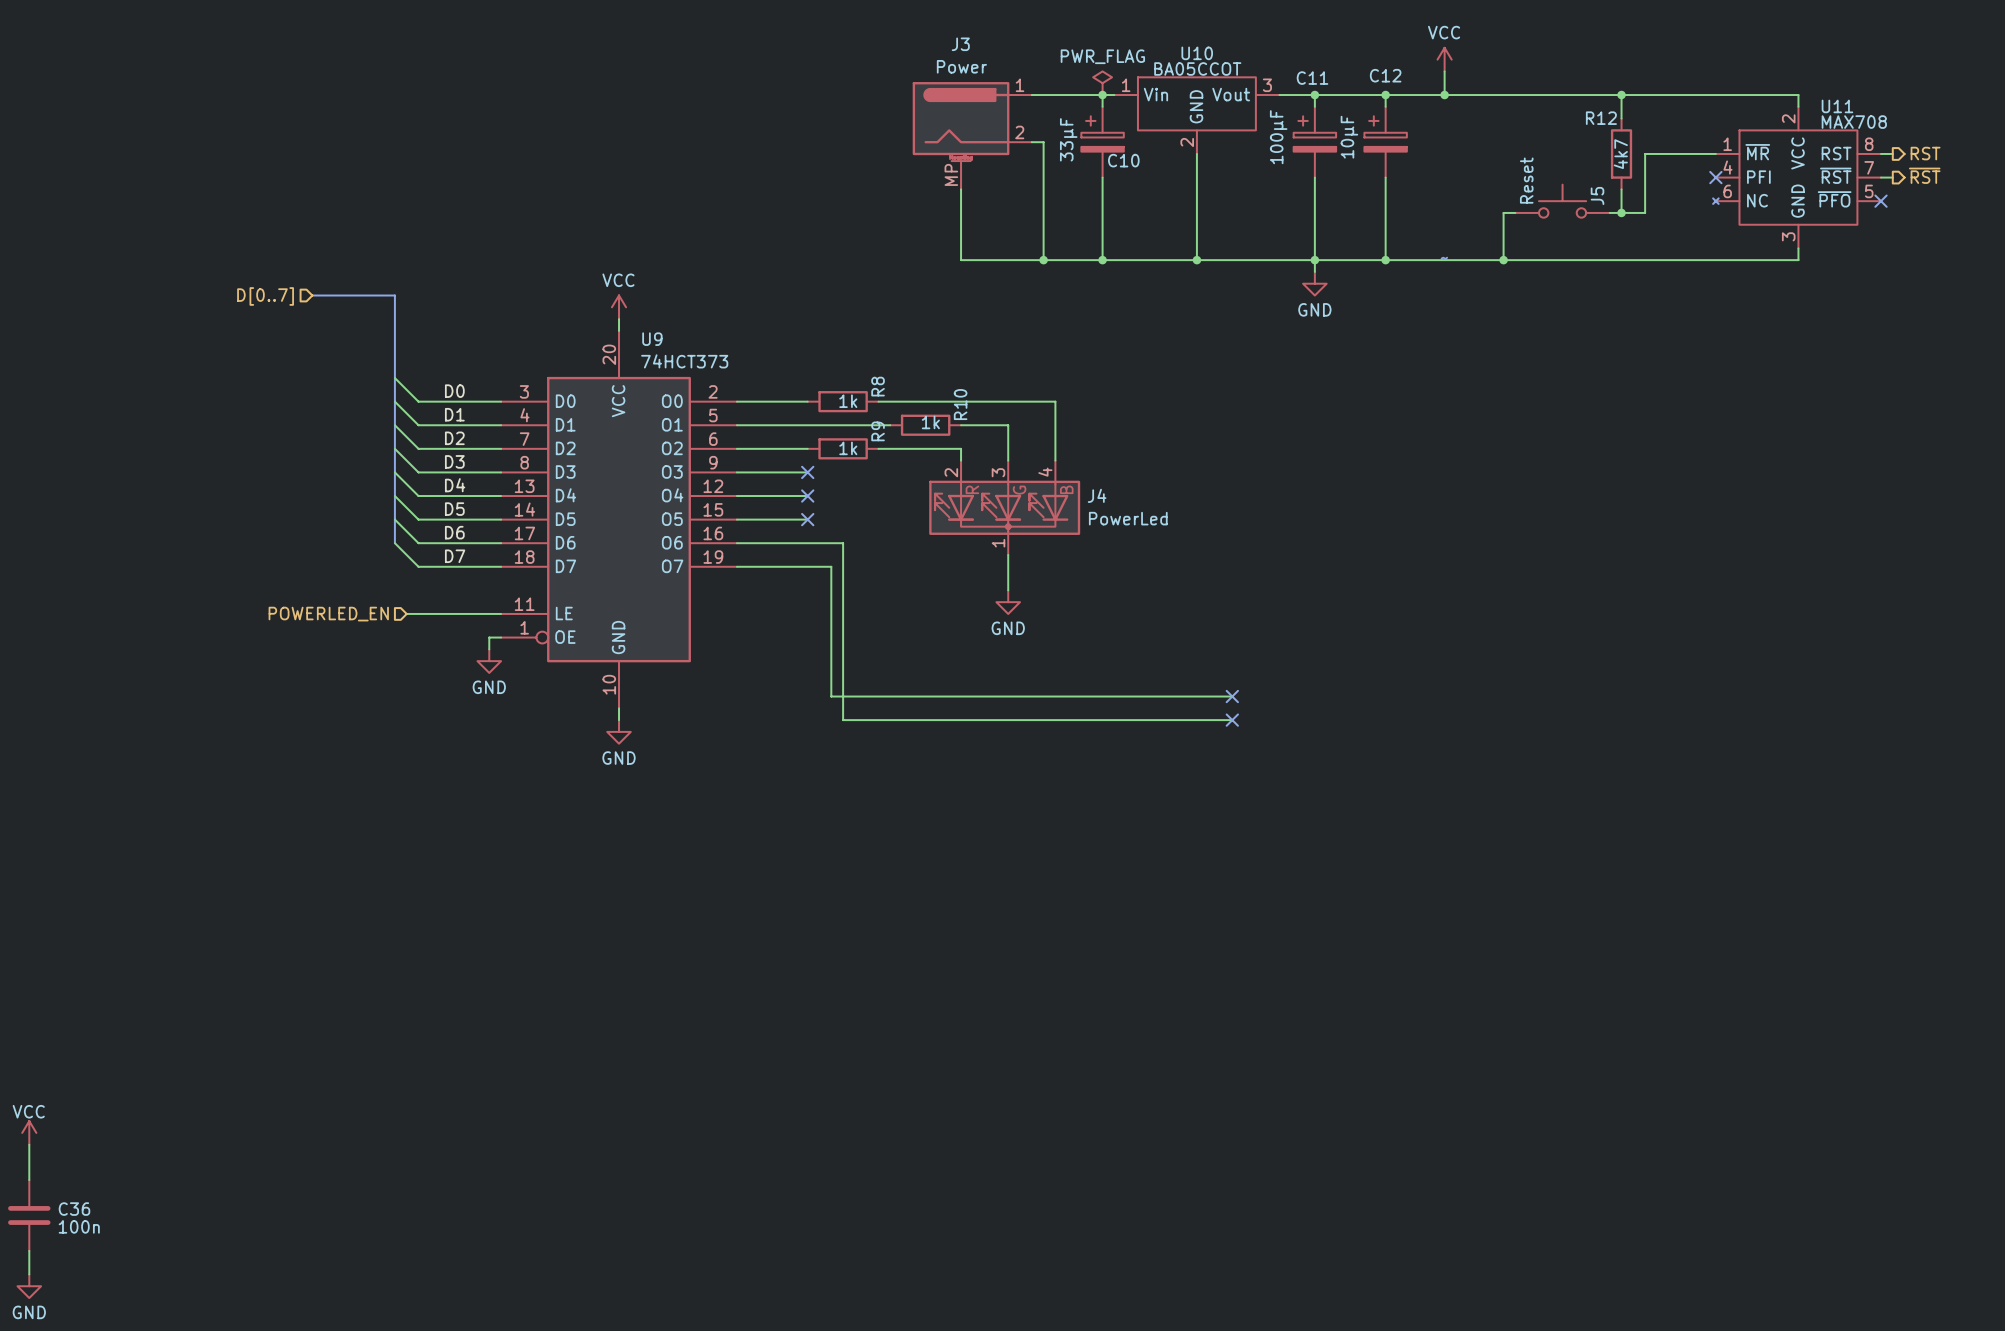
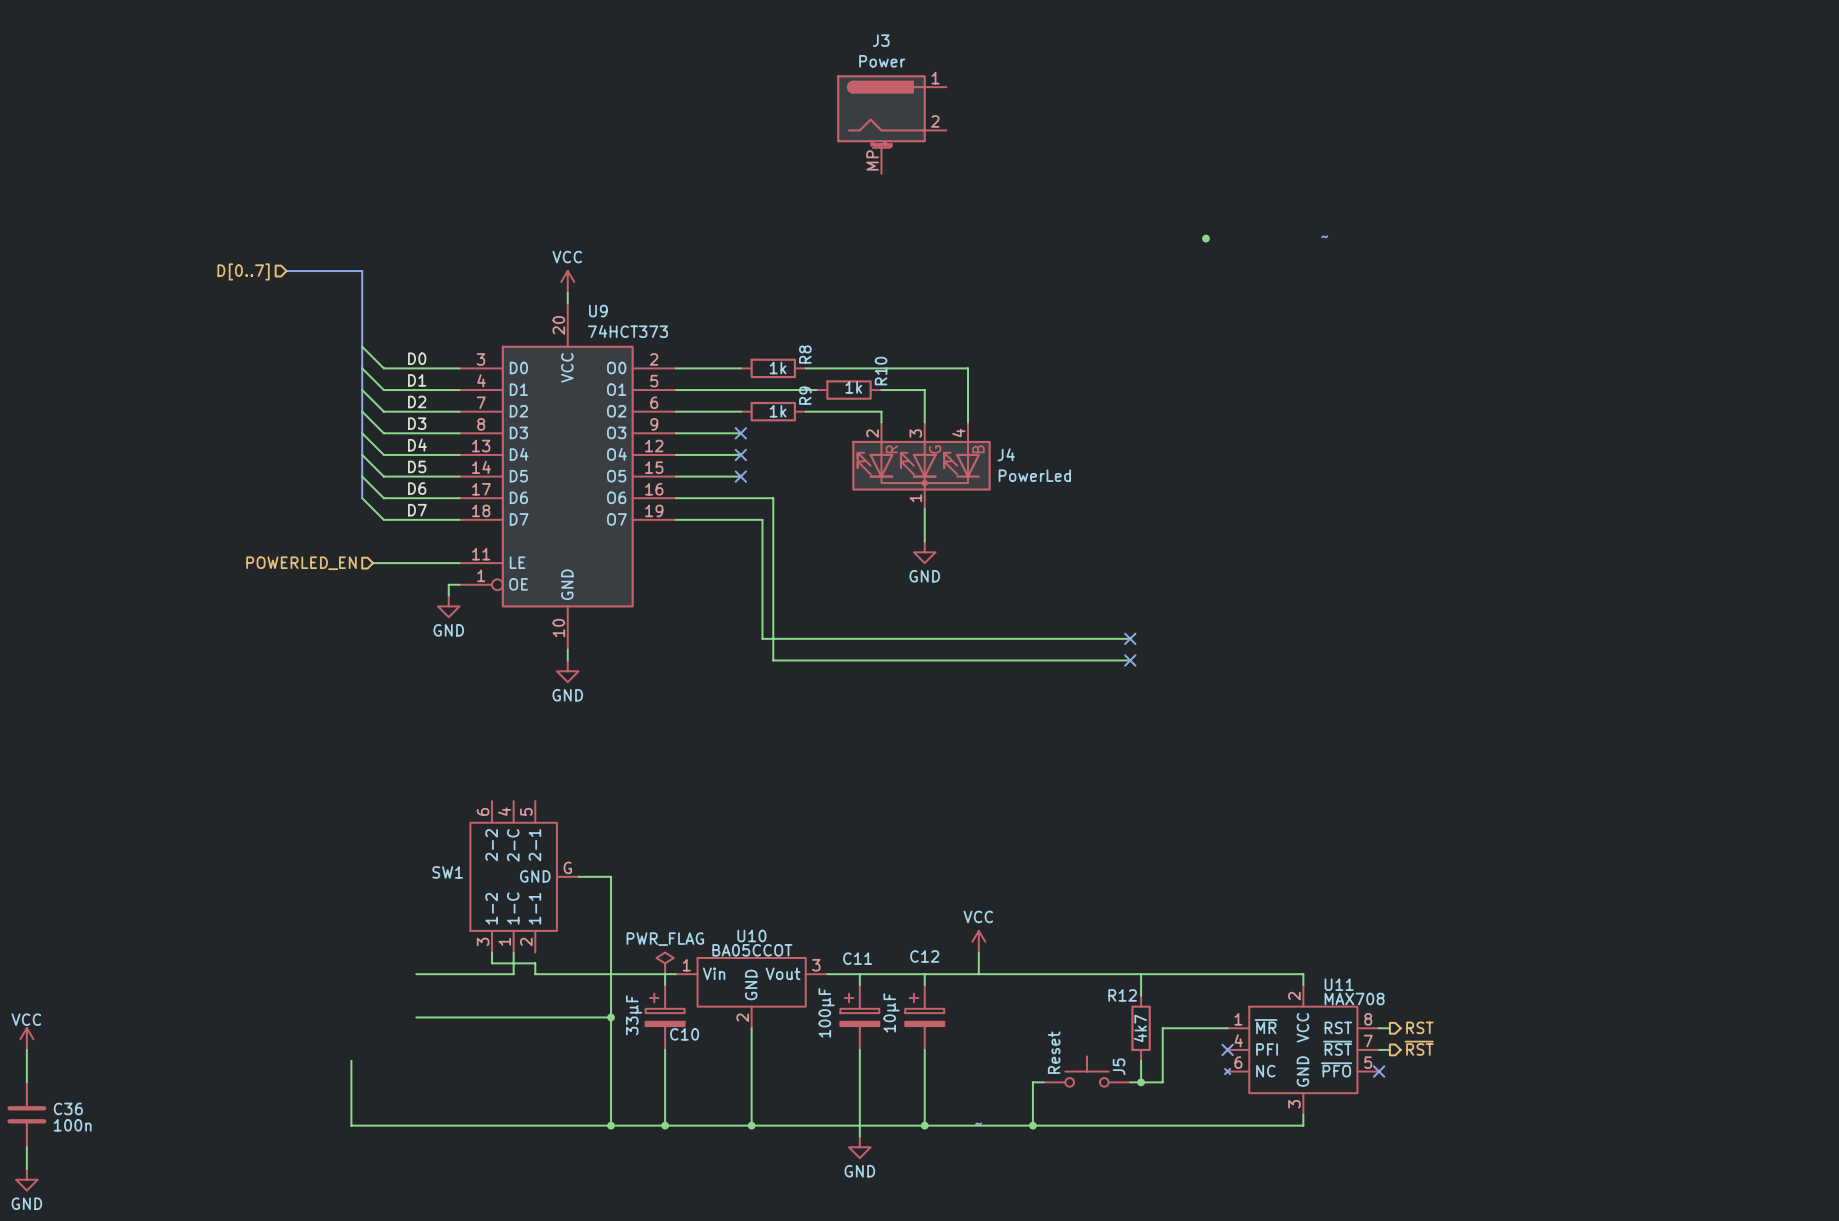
power symbol: VCC (1444, 59) -> none
wire: (1444, 71) (1444, 95) -> none
power symbol: PWR_FLAG (1102, 83) -> none
wire: (1031, 95) (1114, 95) -> none
wire: (1102, 95) (1102, 106) -> none
junction: (1102, 95) -> none
wire: (1279, 95) (1798, 95) (1798, 106) -> none
wire: (1314, 95) (1314, 106) -> none
junction: (1314, 95) -> none
wire: (1385, 95) (1385, 106) -> none
junction: (1385, 95) -> none
junction: (1444, 95) -> none
wire: (1621, 95) (1621, 118) -> none
junction: (1621, 95) -> none
U10 position: (1196, 115) -> (751, 993)
wire: (1031, 142) (1043, 142) (1043, 260) -> none
C10 position: (1102, 142) -> (665, 1017)
C11 position: (1314, 142) -> (859, 1017)
C12 position: (1385, 142) -> (924, 1017)
wire: (1196, 153) (1196, 260) -> none
R12 position: (1621, 153) -> (1141, 1028)
wire: (1715, 153) (1645, 153) (1645, 212) (1609, 212) -> none
wire: (1881, 153) (1892, 153) -> none
hierarchical label: RST (1925, 153) -> none
hierarchical label: ~{RST} (1924, 175) -> none
wire: (1102, 177) (1102, 260) -> none
wire: (1314, 177) (1314, 271) -> none
wire: (1385, 177) (1385, 260) -> none
no-connect mark: (1715, 177) -> none
U11 position: (1797, 177) -> (1302, 1049)
wire: (1881, 177) (1892, 177) -> none
wire: (961, 189) (961, 260) (1798, 260) (1798, 248) -> none
wire: (1621, 189) (1621, 212) -> none
J5 position: (1562, 201) -> (1087, 1071)
no-connect mark: (1881, 201) -> none
wire: (1515, 212) (1503, 212) (1503, 260) -> none
junction: (1621, 212) -> none
junction: (1043, 260) -> none
junction: (1102, 260) -> none
junction: (1196, 260) -> none
junction: (1385, 260) -> none
junction: (1503, 260) -> none
power symbol: GND (1314, 283) -> none
SW1: none -> (524, 876)
wire: none -> (578, 876) (611, 876) (611, 1125)
power symbol: none -> VCC (978, 941)
wire: none -> (492, 952) (492, 963) (535, 963) (535, 974) (675, 974)
wire: none -> (513, 952) (513, 974) (416, 974)
wire: none -> (978, 952) (978, 974)
power symbol: none -> PWR_FLAG (665, 963)
wire: none -> (665, 974) (665, 985)
wire: none -> (827, 974) (1303, 974) (1303, 985)
wire: none -> (859, 974) (859, 985)
wire: none -> (924, 974) (924, 985)
wire: none -> (1141, 974) (1141, 995)
wire: none -> (416, 1017) (611, 1017)
junction: none -> (611, 1017)
hierarchical label: none -> RST (1419, 1027)
wire: none -> (751, 1028) (751, 1125)
wire: none -> (1227, 1028) (1162, 1028) (1162, 1082) (1130, 1082)
wire: none -> (1379, 1028) (1389, 1028)
hierarchical label: none -> ~{RST} (1419, 1048)
wire: none -> (665, 1049) (665, 1125)
wire: none -> (859, 1049) (859, 1136)
wire: none -> (924, 1049) (924, 1125)
no-connect mark: none -> (1227, 1049)
wire: none -> (1379, 1049) (1389, 1049)
wire: none -> (351, 1060) (351, 1125) (1303, 1125) (1303, 1114)
wire: none -> (1141, 1060) (1141, 1082)
no-connect mark: none -> (1379, 1071)
wire: none -> (1043, 1082) (1032, 1082) (1032, 1125)
junction: none -> (1141, 1082)
text: none -> ~ (978, 1123)
junction: none -> (611, 1125)
junction: none -> (665, 1125)
junction: none -> (751, 1125)
junction: none -> (924, 1125)
junction: none -> (1032, 1125)
power symbol: none -> GND (859, 1147)

